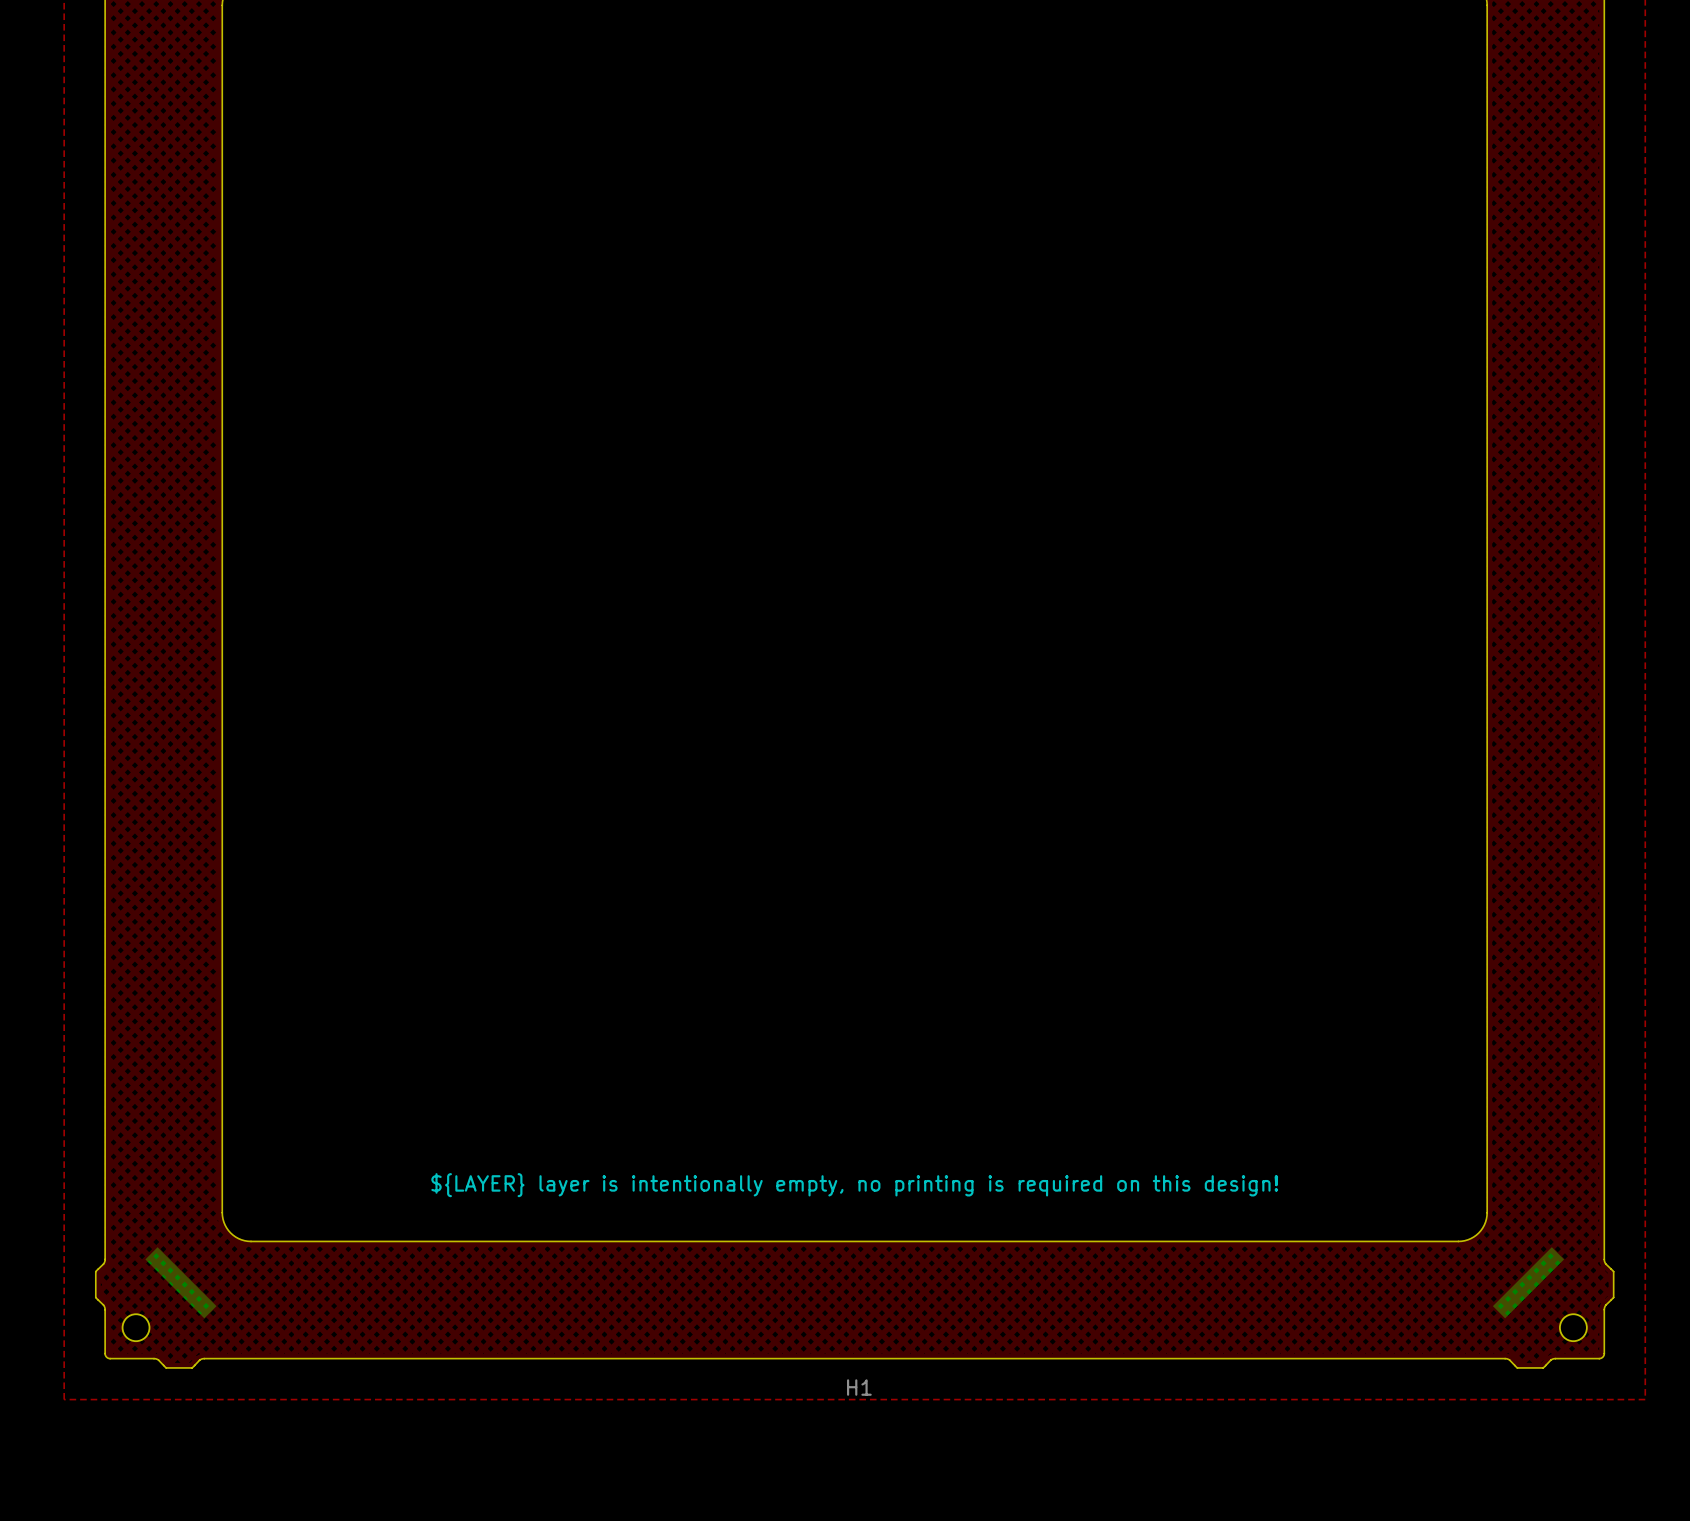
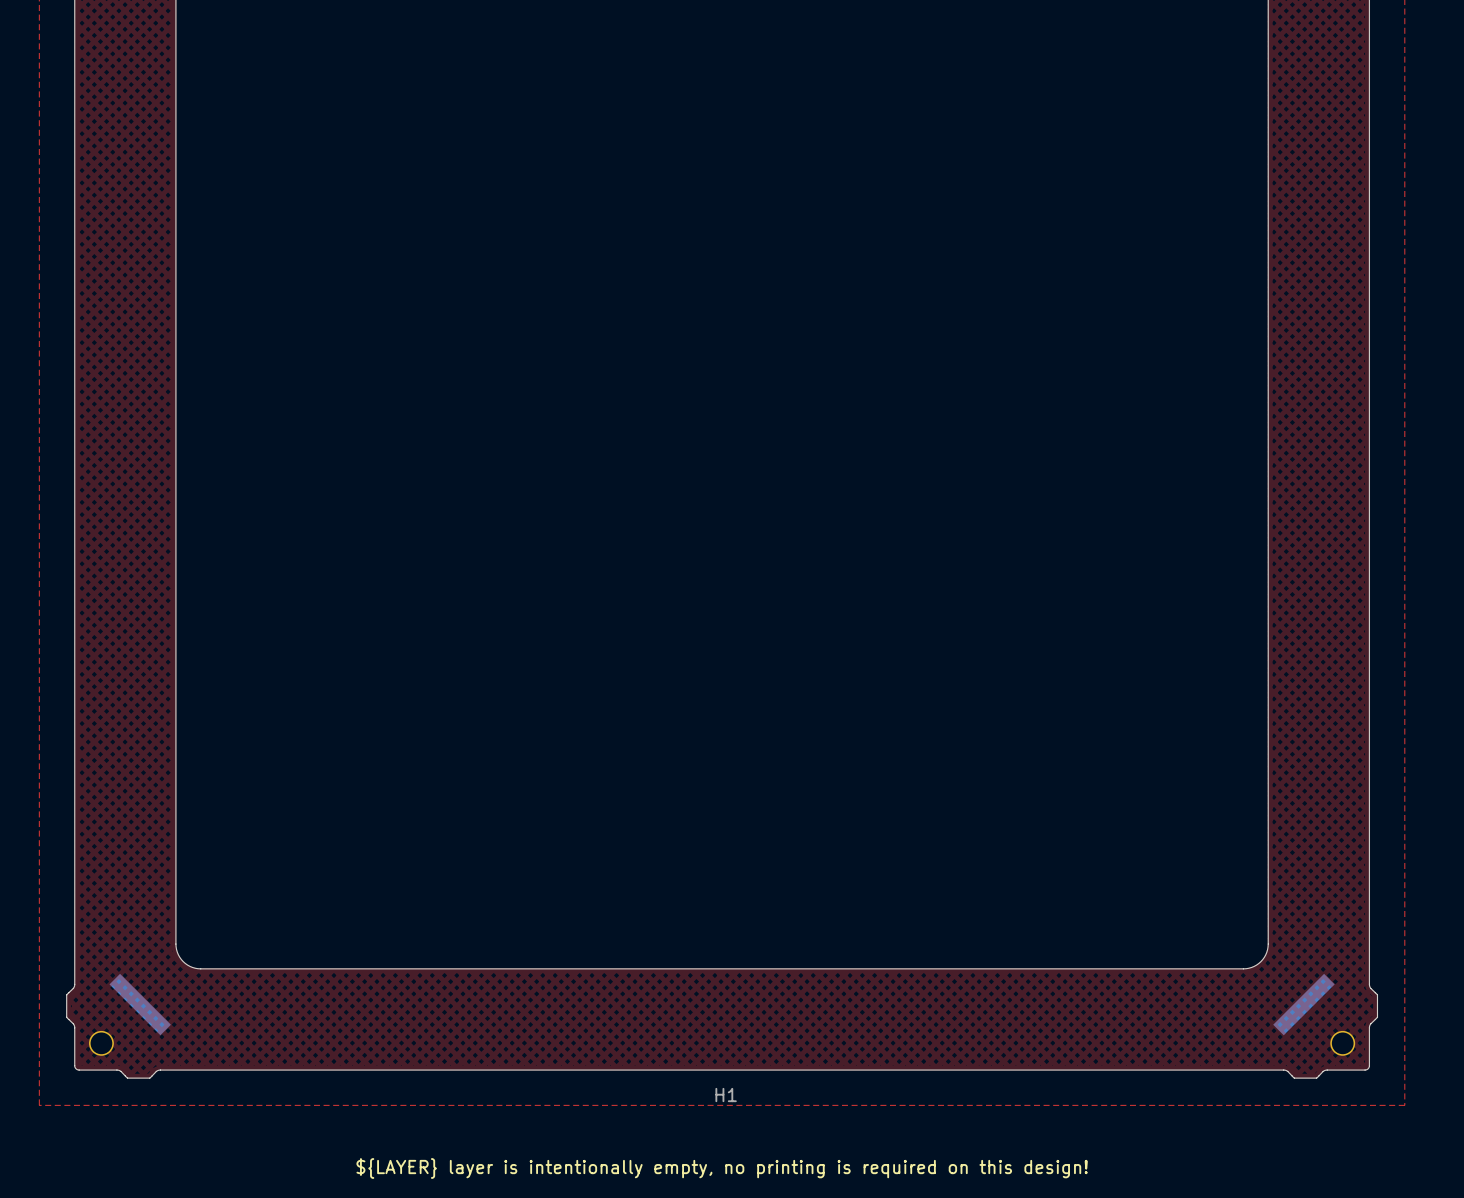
text position: ${LAYER} layer is intentionally empty, no printing is required on this design! (854, 1185) -> ${LAYER} layer is intentionally empty, no printing is required on this design! (722, 1168)

